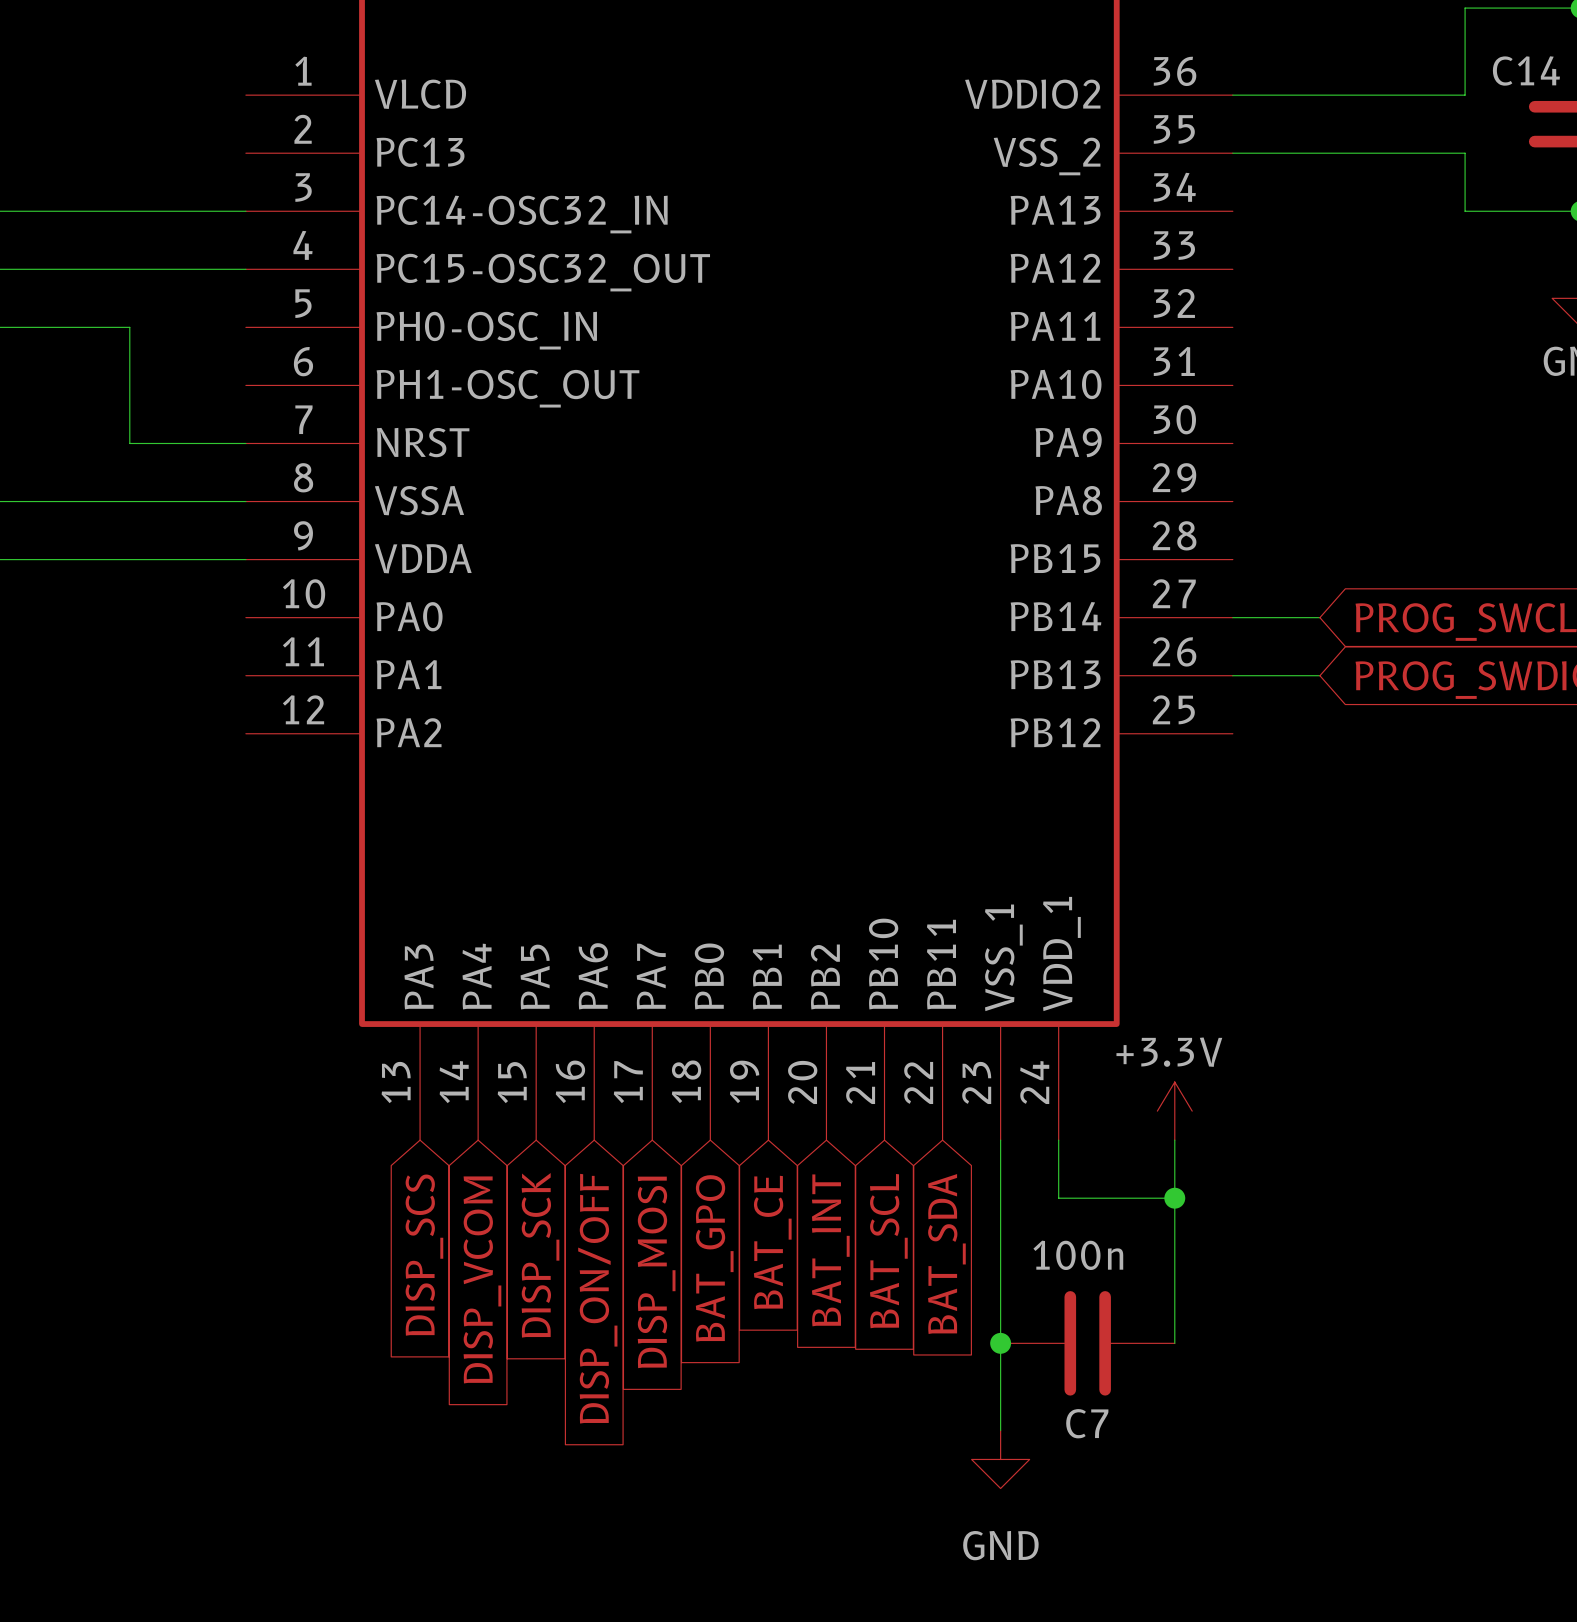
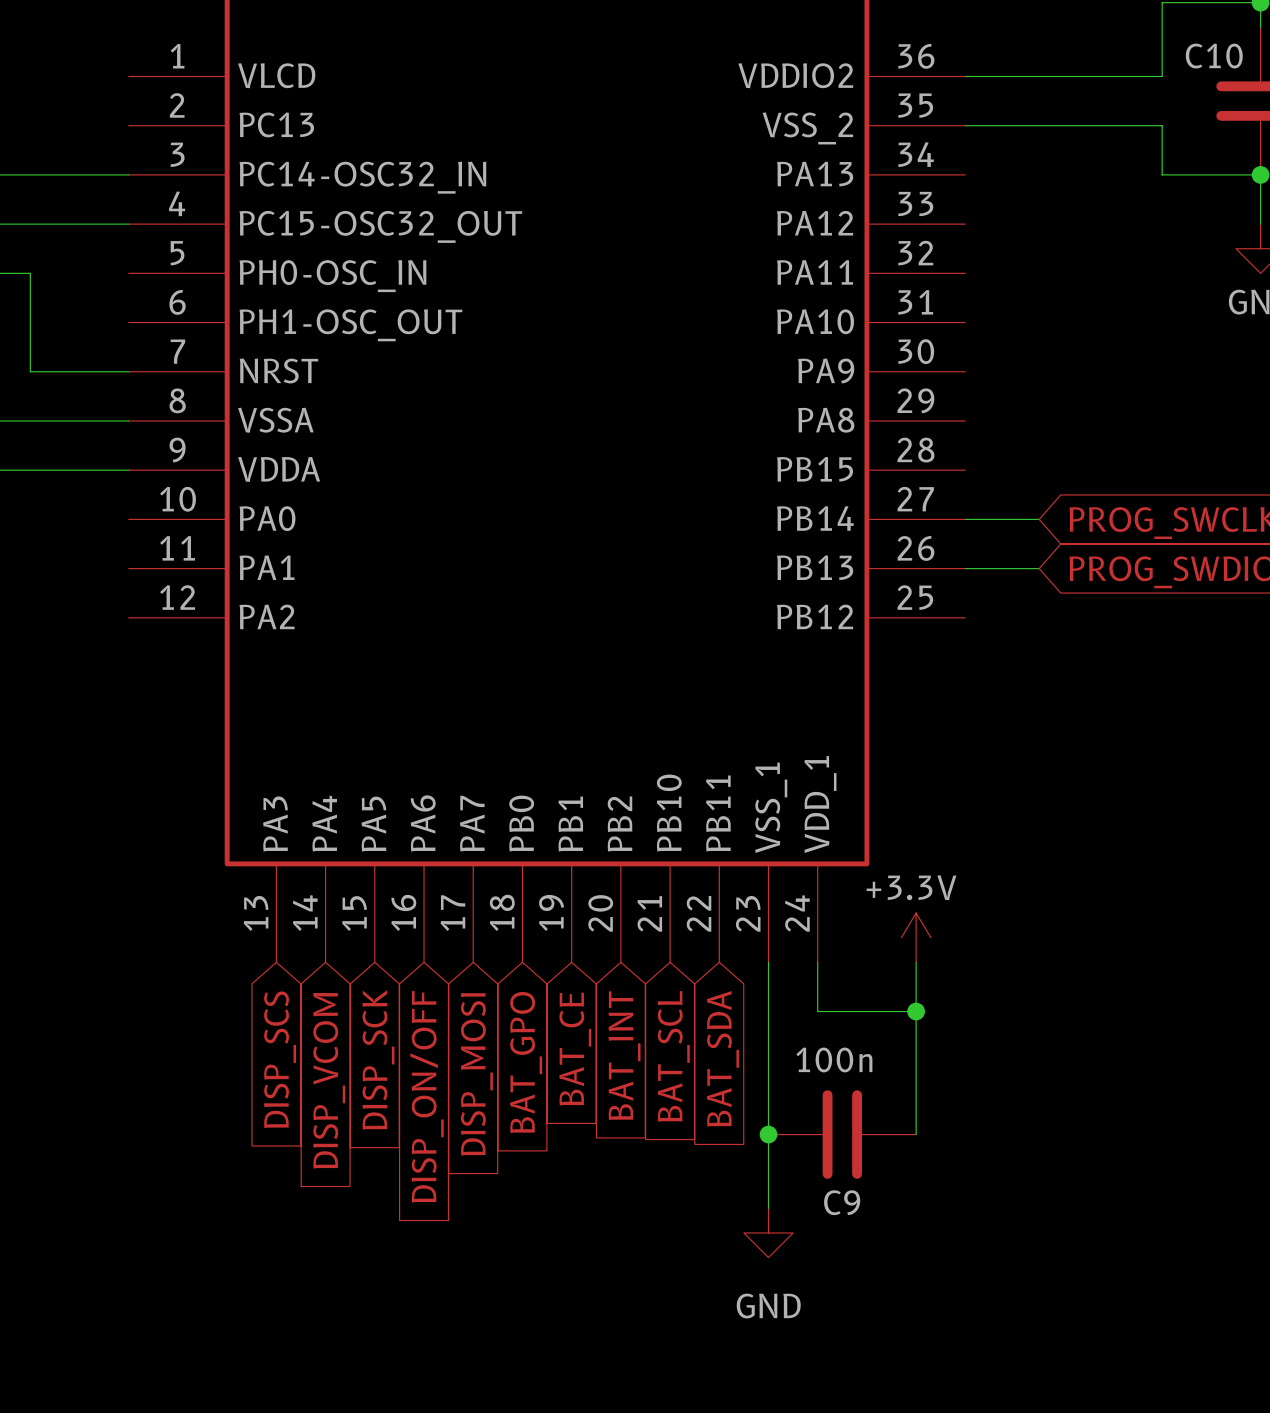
C14 name: C14 (1526, 71) -> C10 (1214, 56)
C7 name: C7 (1087, 1423) -> C9 (842, 1202)

